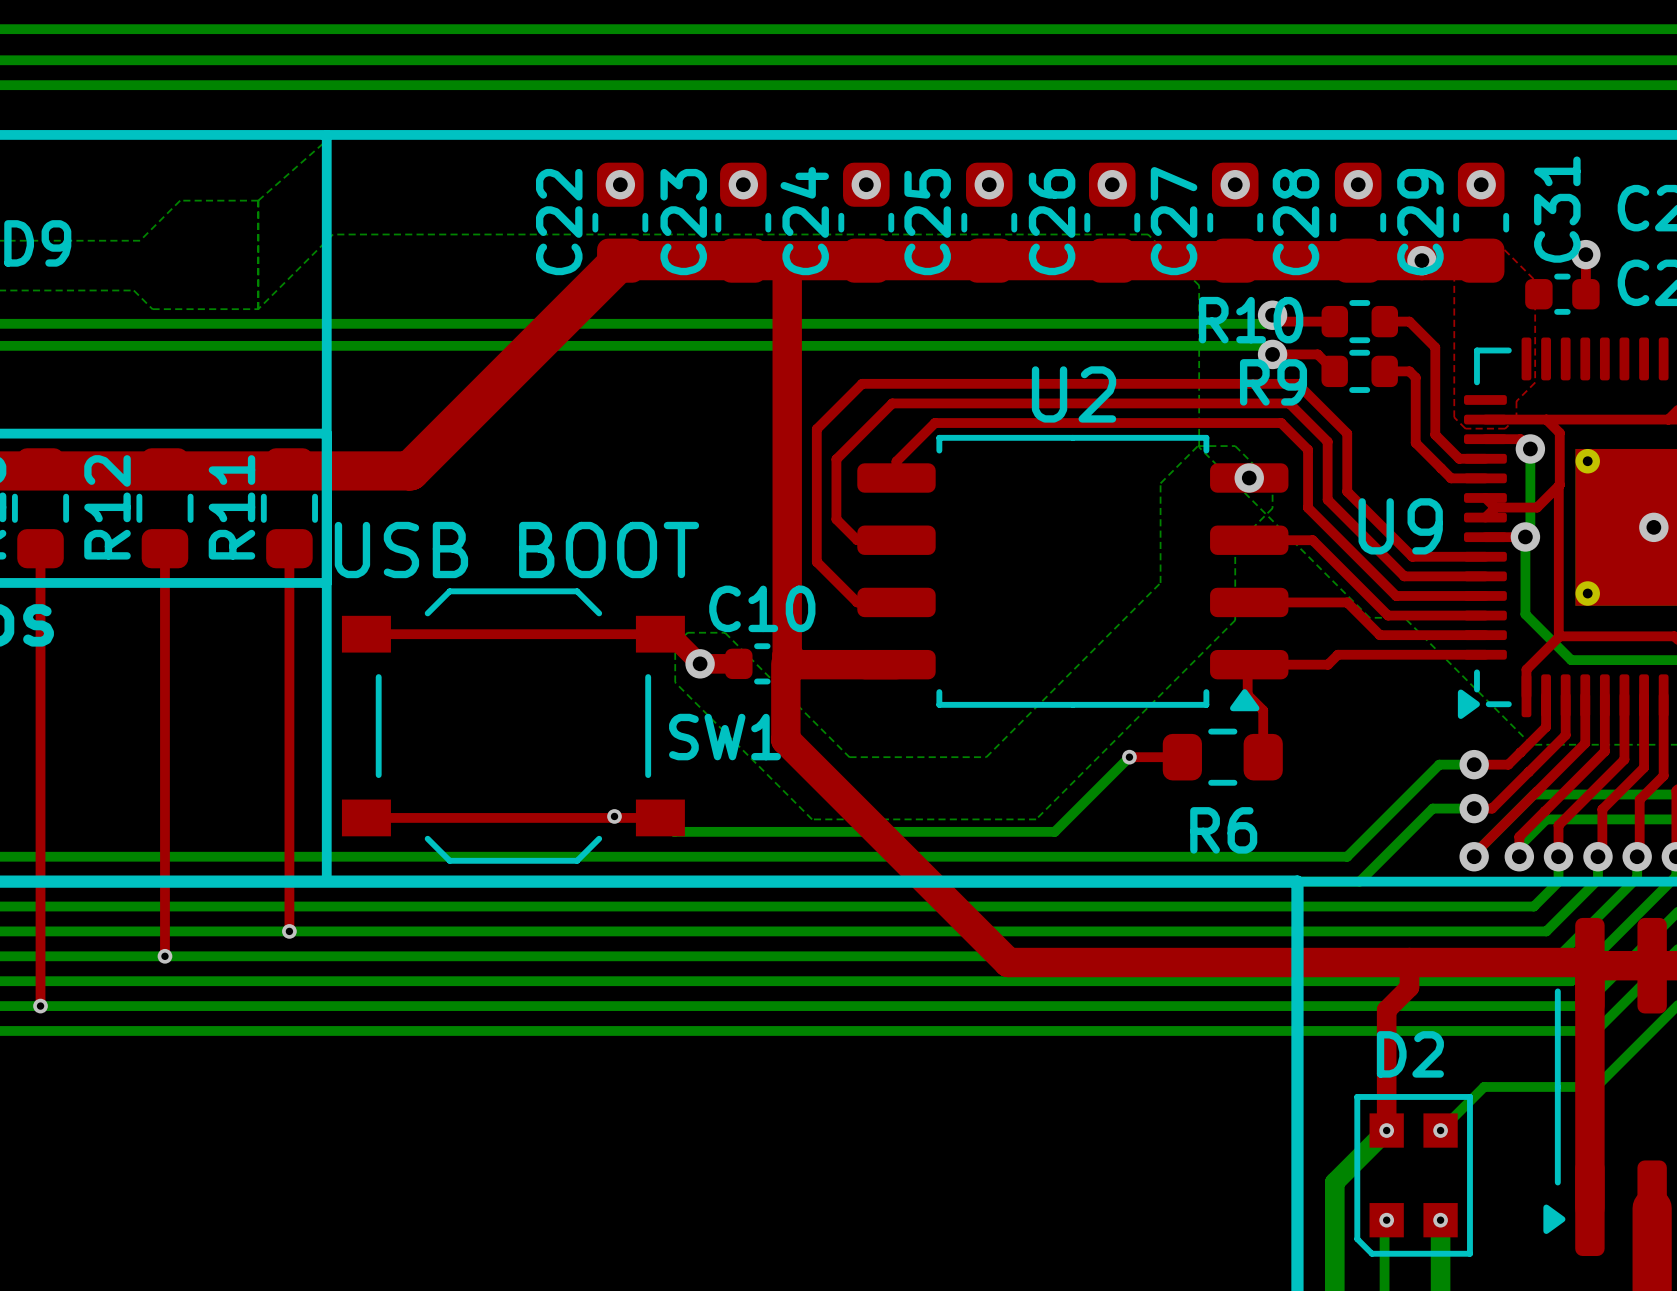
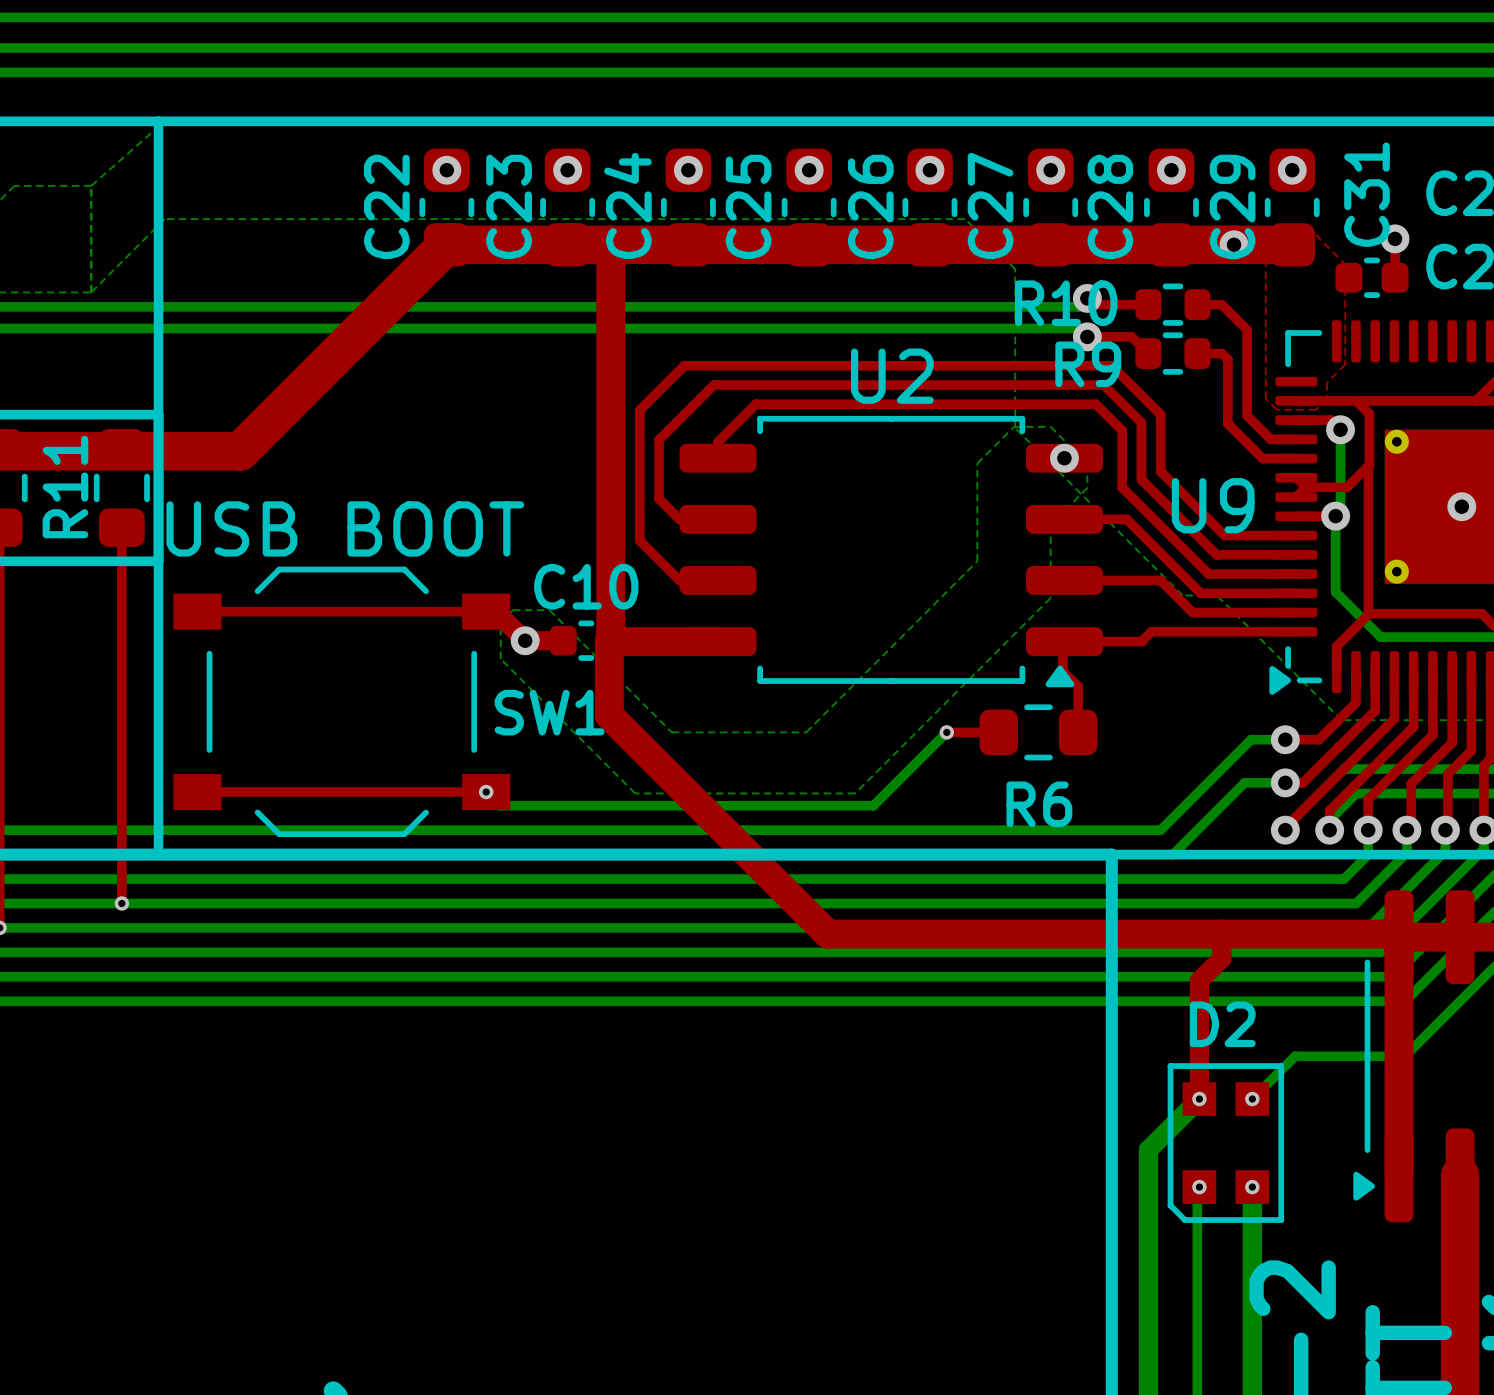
via position: (614, 816) -> (486, 792)

